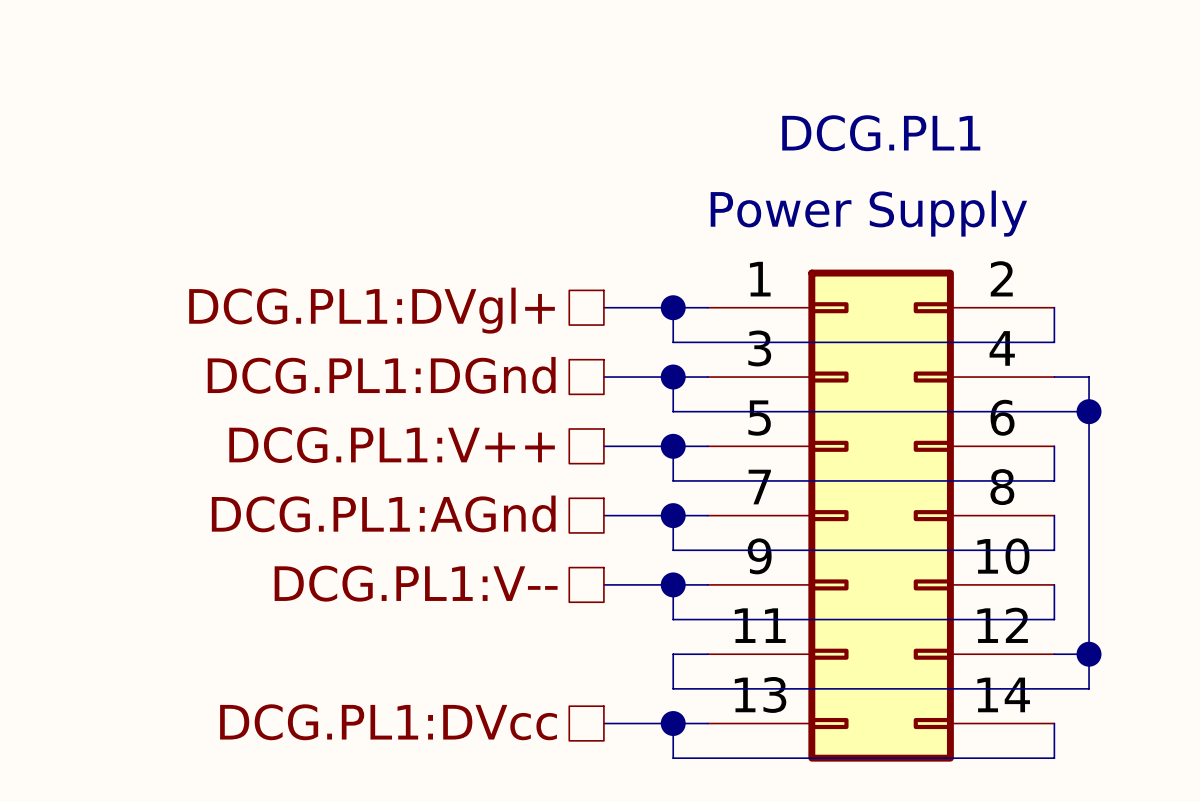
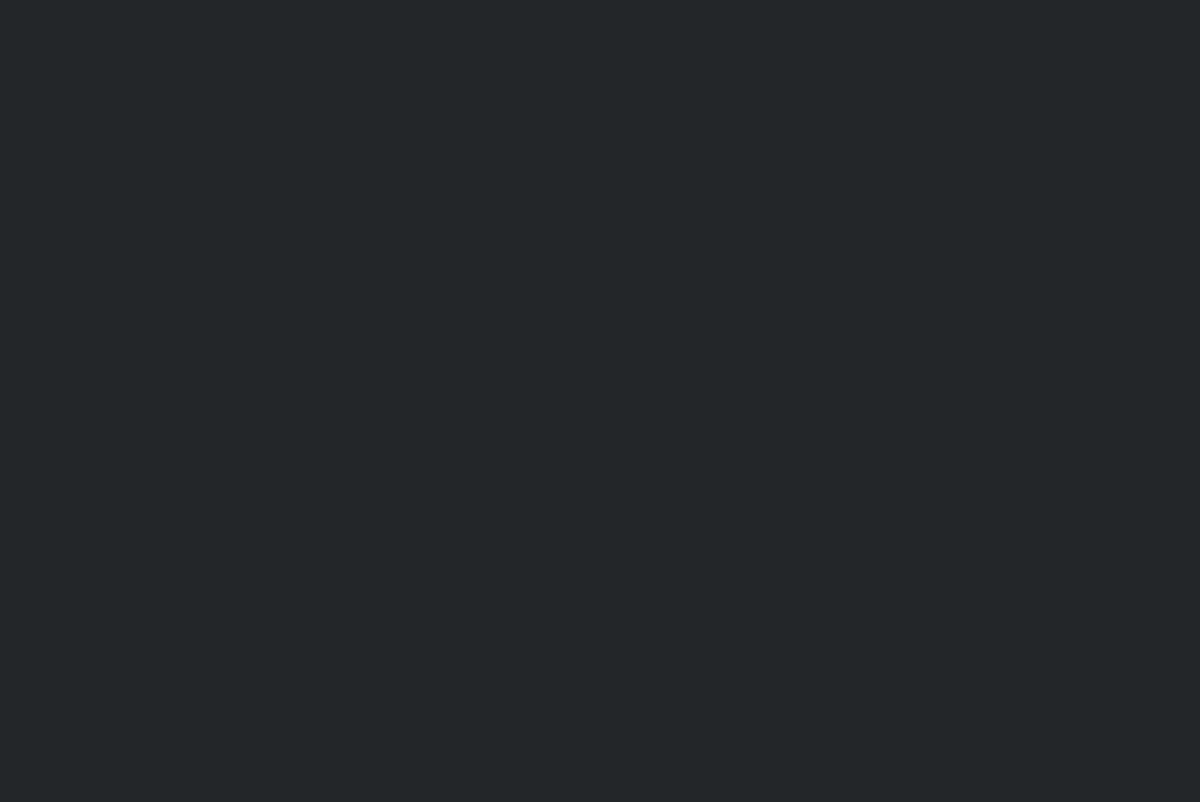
wire: (603, 307) (707, 307) -> none
wire: (673, 307) (673, 342) (1054, 342) (1054, 307) -> none
junction: (673, 307) -> none
hierarchical label: DCG.PL1:DVgl+ (372, 310) -> none
hierarchical label: DCG.PL1:DGnd (381, 375) -> none
wire: (603, 377) (707, 377) -> none
wire: (673, 377) (673, 411) (1089, 411) -> none
junction: (673, 377) -> none
wire: (1054, 377) (1089, 377) (1089, 688) (673, 688) (673, 654) (707, 654) -> none
junction: (1089, 411) -> none
hierarchical label: DCG.PL1:V++ (392, 445) -> none
wire: (603, 446) (707, 446) -> none
wire: (673, 446) (673, 480) (1054, 480) (1054, 446) -> none
junction: (673, 446) -> none
hierarchical label: DCG.PL1:AGnd (383, 513) -> none
wire: (603, 515) (707, 515) -> none
wire: (673, 515) (673, 550) (1054, 550) (1054, 515) -> none
junction: (673, 515) -> none
DCG.PL1: (881, 515) -> none
hierarchical label: DCG.PL1:V-- (416, 583) -> none
wire: (603, 584) (707, 584) -> none
wire: (673, 584) (673, 619) (1054, 619) (1054, 584) -> none
junction: (673, 584) -> none
wire: (1054, 654) (1089, 654) -> none
junction: (1089, 654) -> none
hierarchical label: DCG.PL1:DVcc (388, 722) -> none
wire: (603, 723) (707, 723) -> none
wire: (673, 723) (673, 758) (1054, 758) (1054, 723) -> none
junction: (673, 723) -> none

